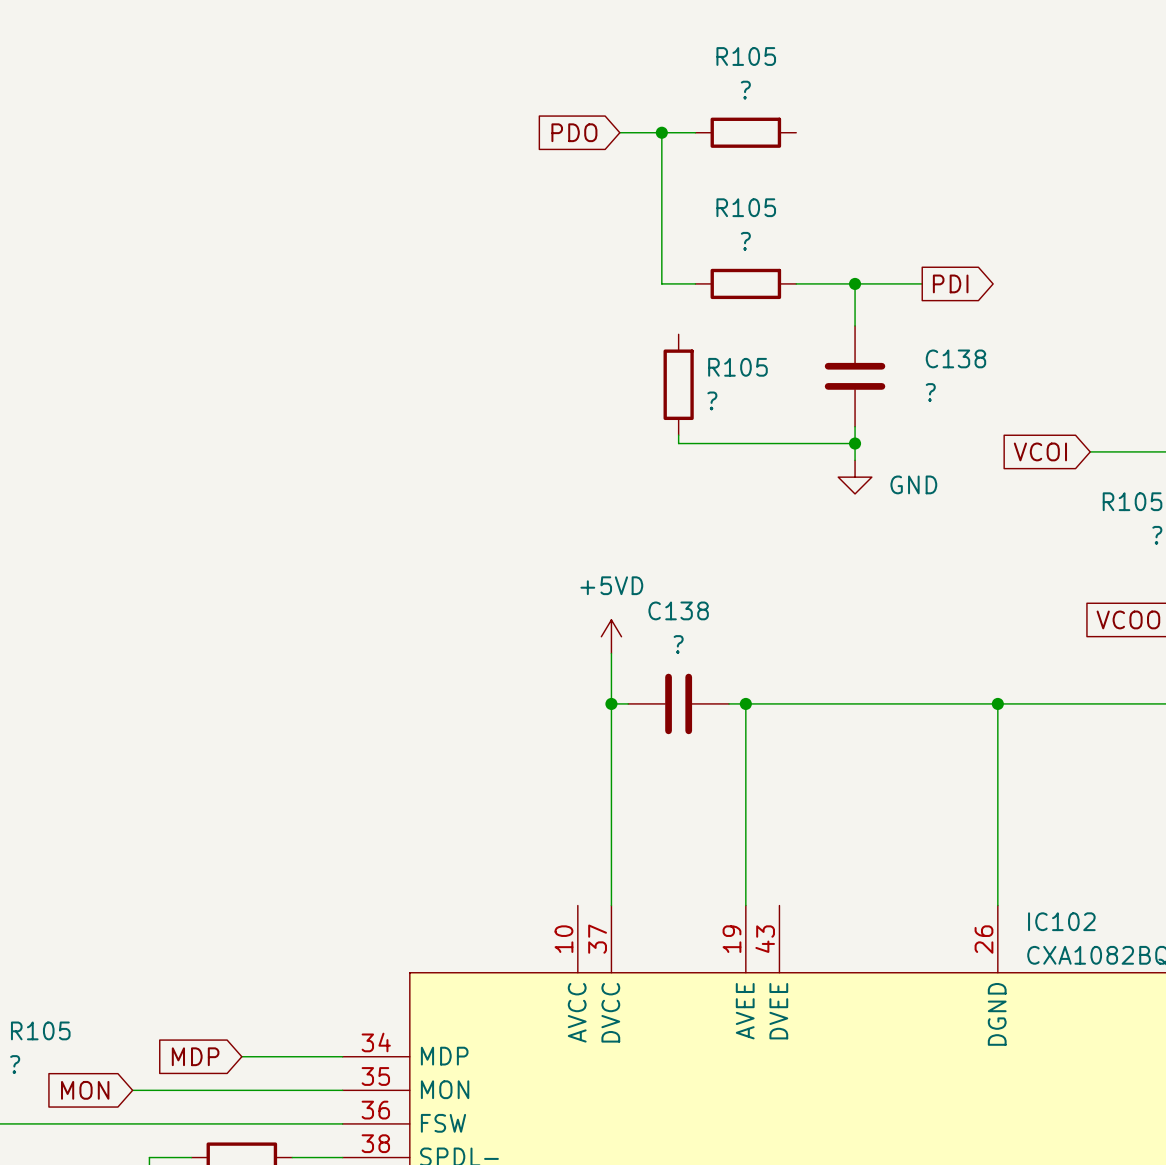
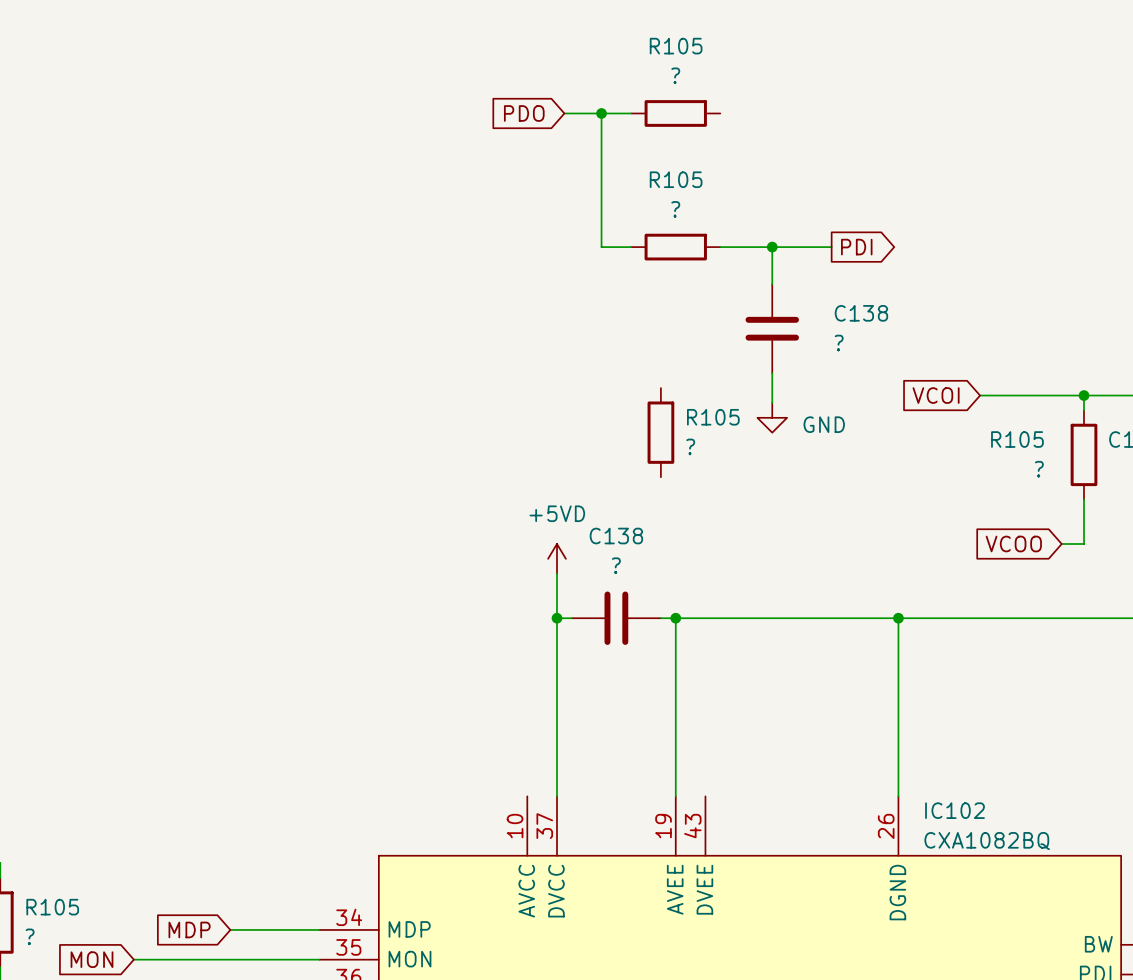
R105 position: (678, 384) -> (660, 432)
wire: (678, 435) (678, 443) (855, 443) -> none
junction: (855, 443) -> none

